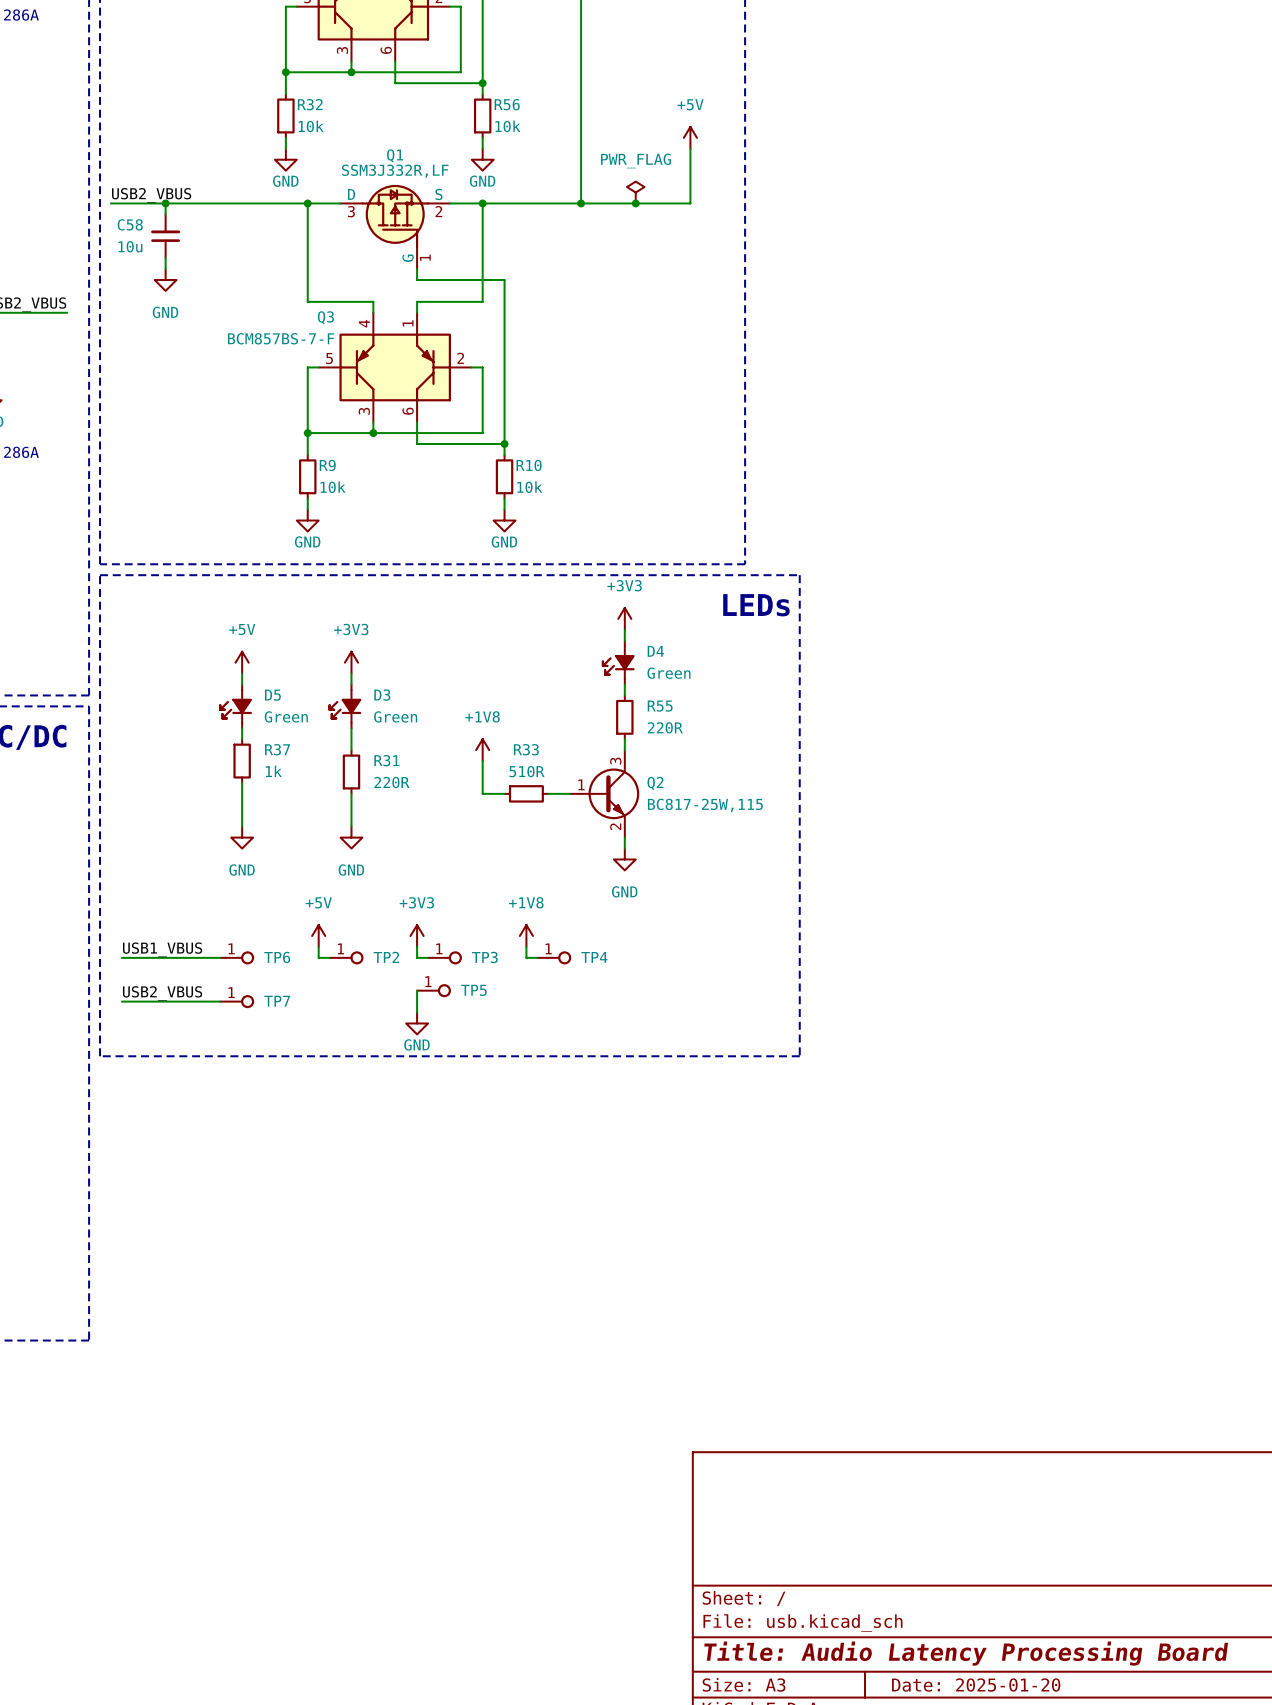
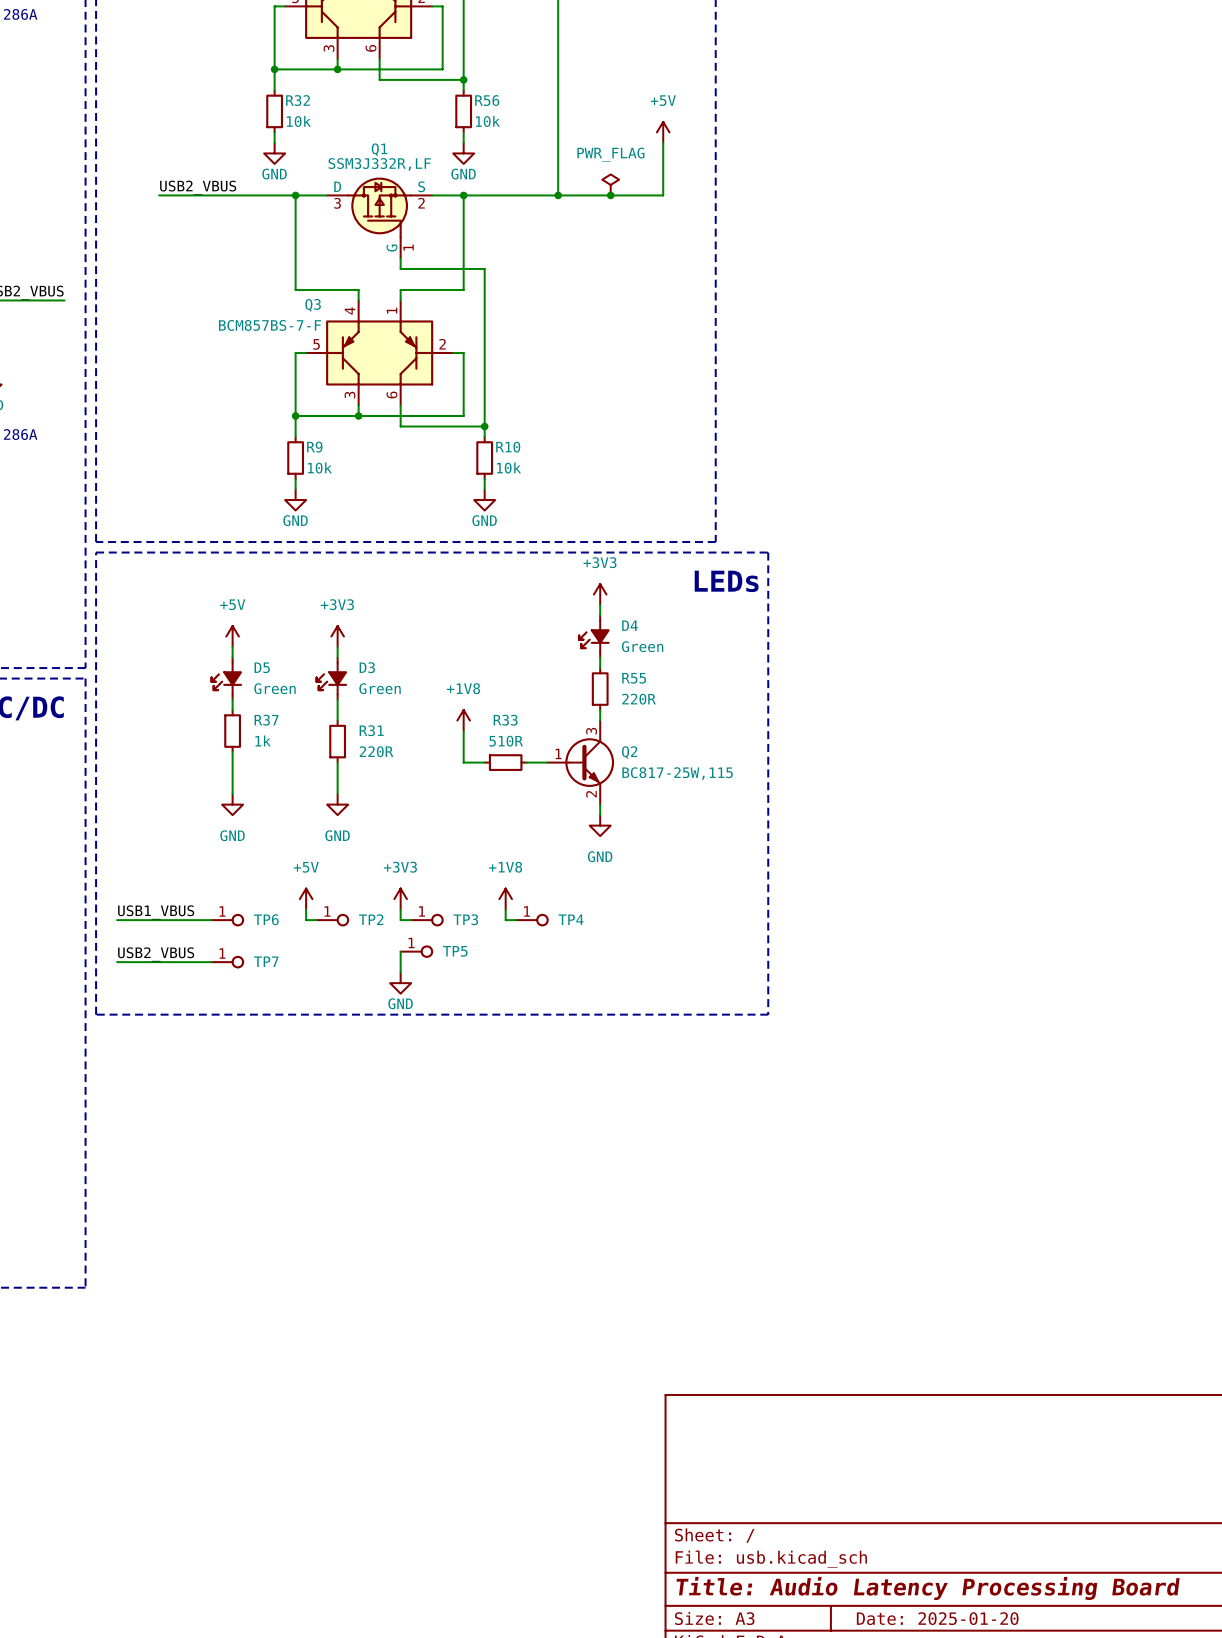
label position: USB2_VBUS (151, 195) -> USB2_VBUS (198, 187)
wire: (110, 203) (165, 203) (165, 214) -> none
junction: (165, 203) -> none
C58: (165, 236) -> none
wire: (165, 258) (165, 269) -> none
power symbol: GND (165, 279) -> none

